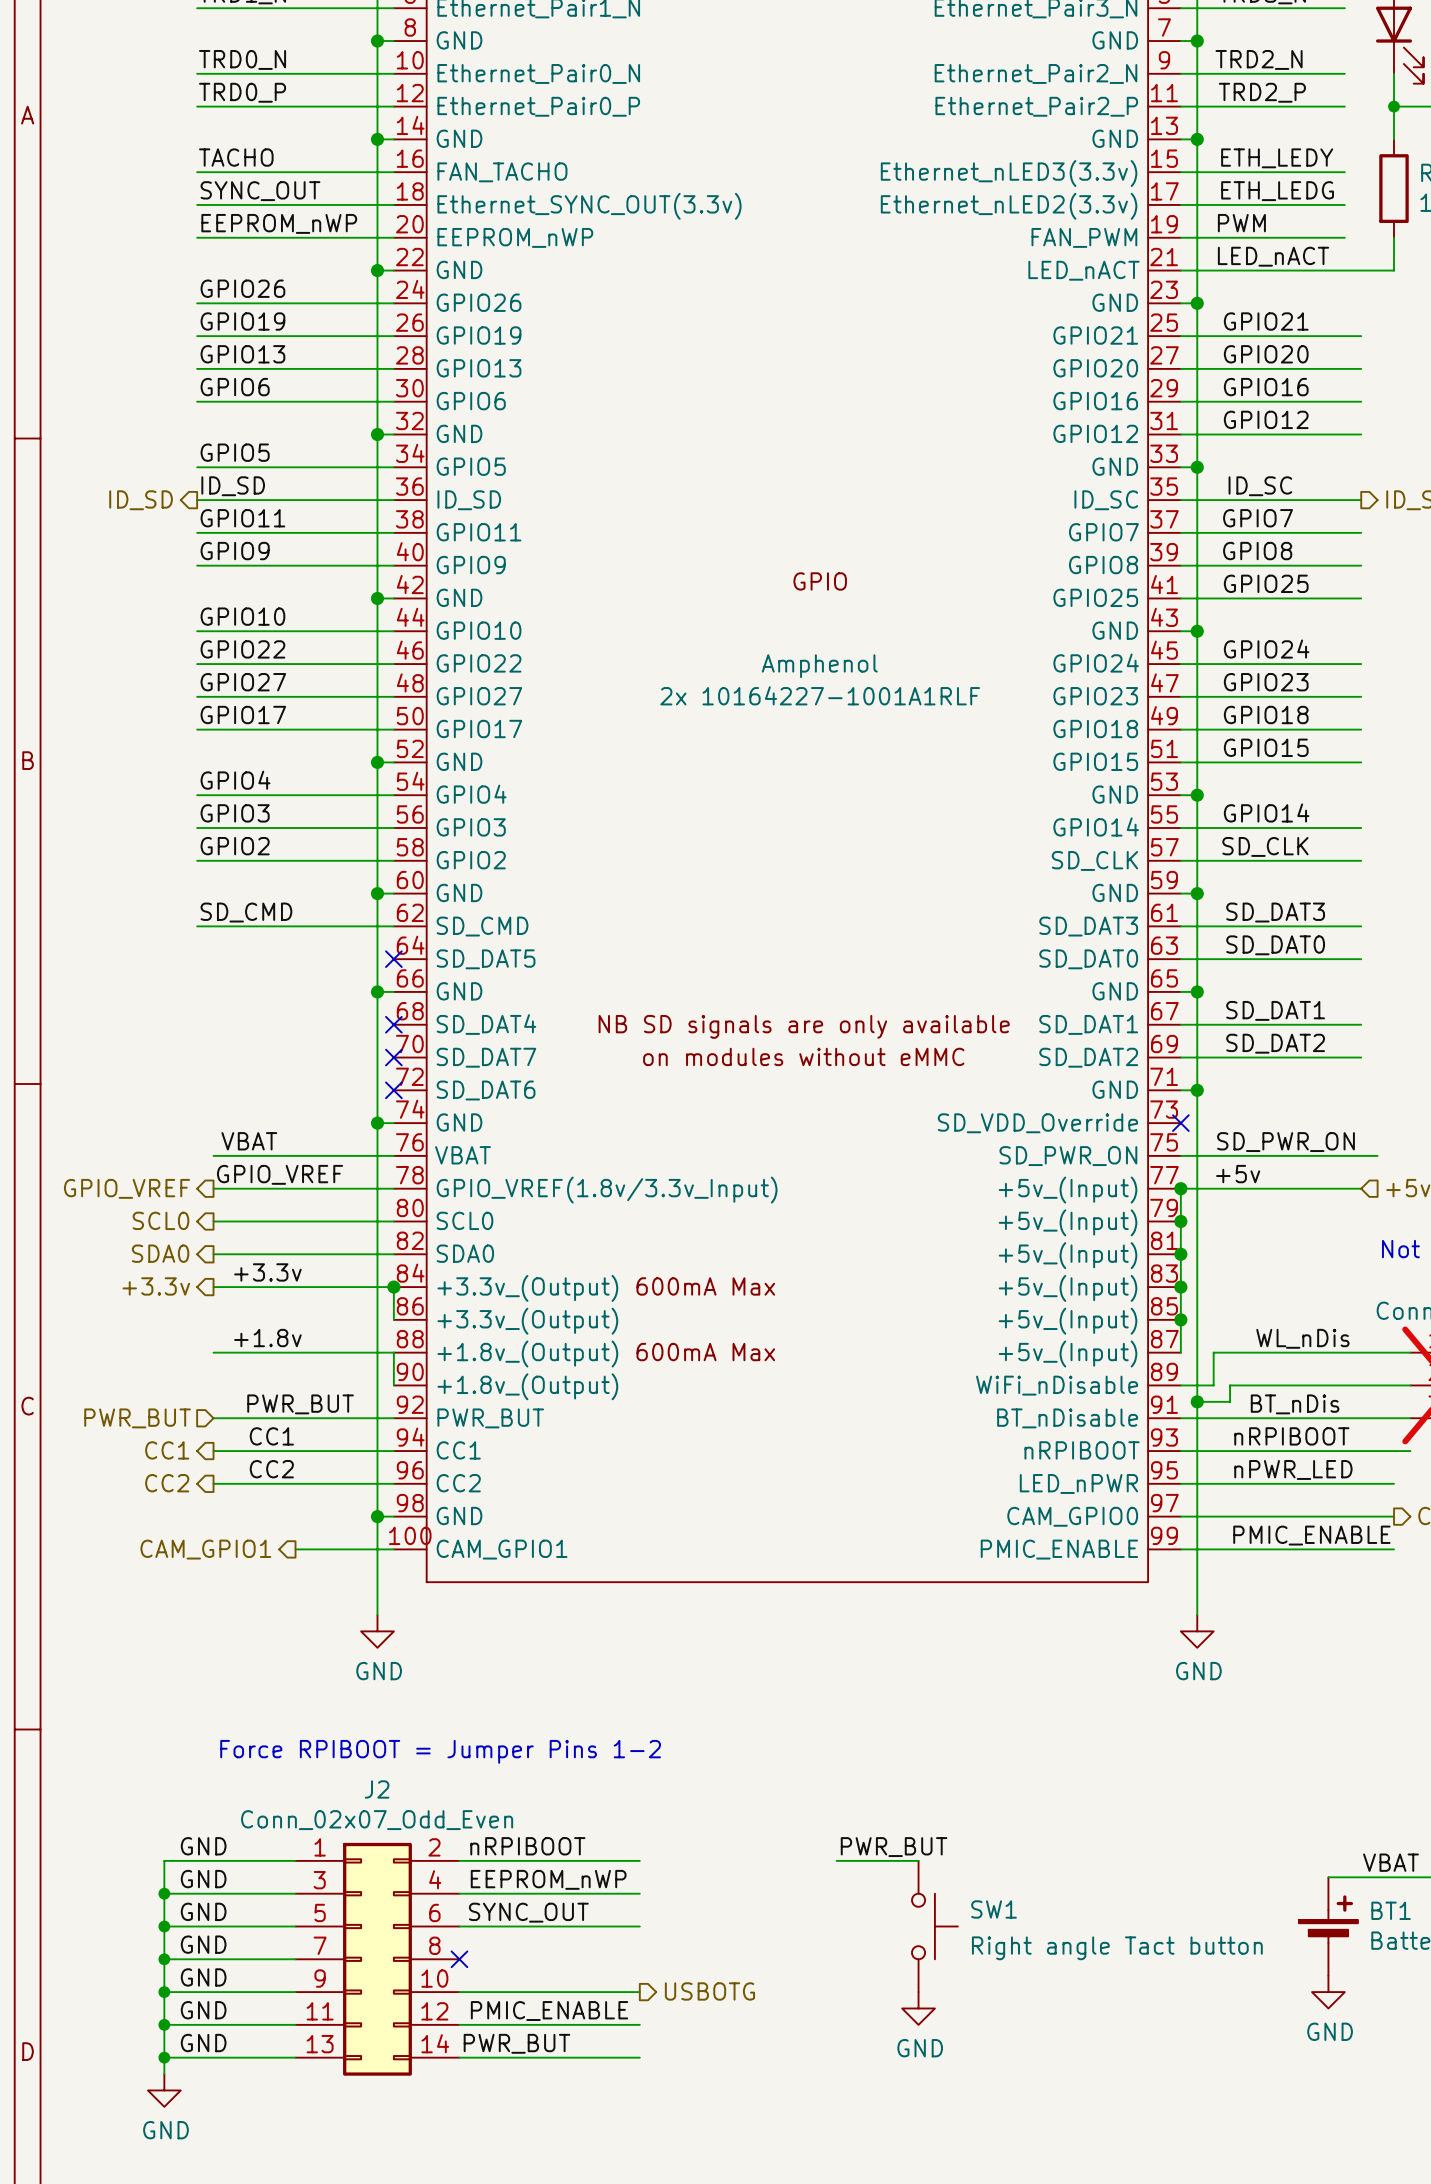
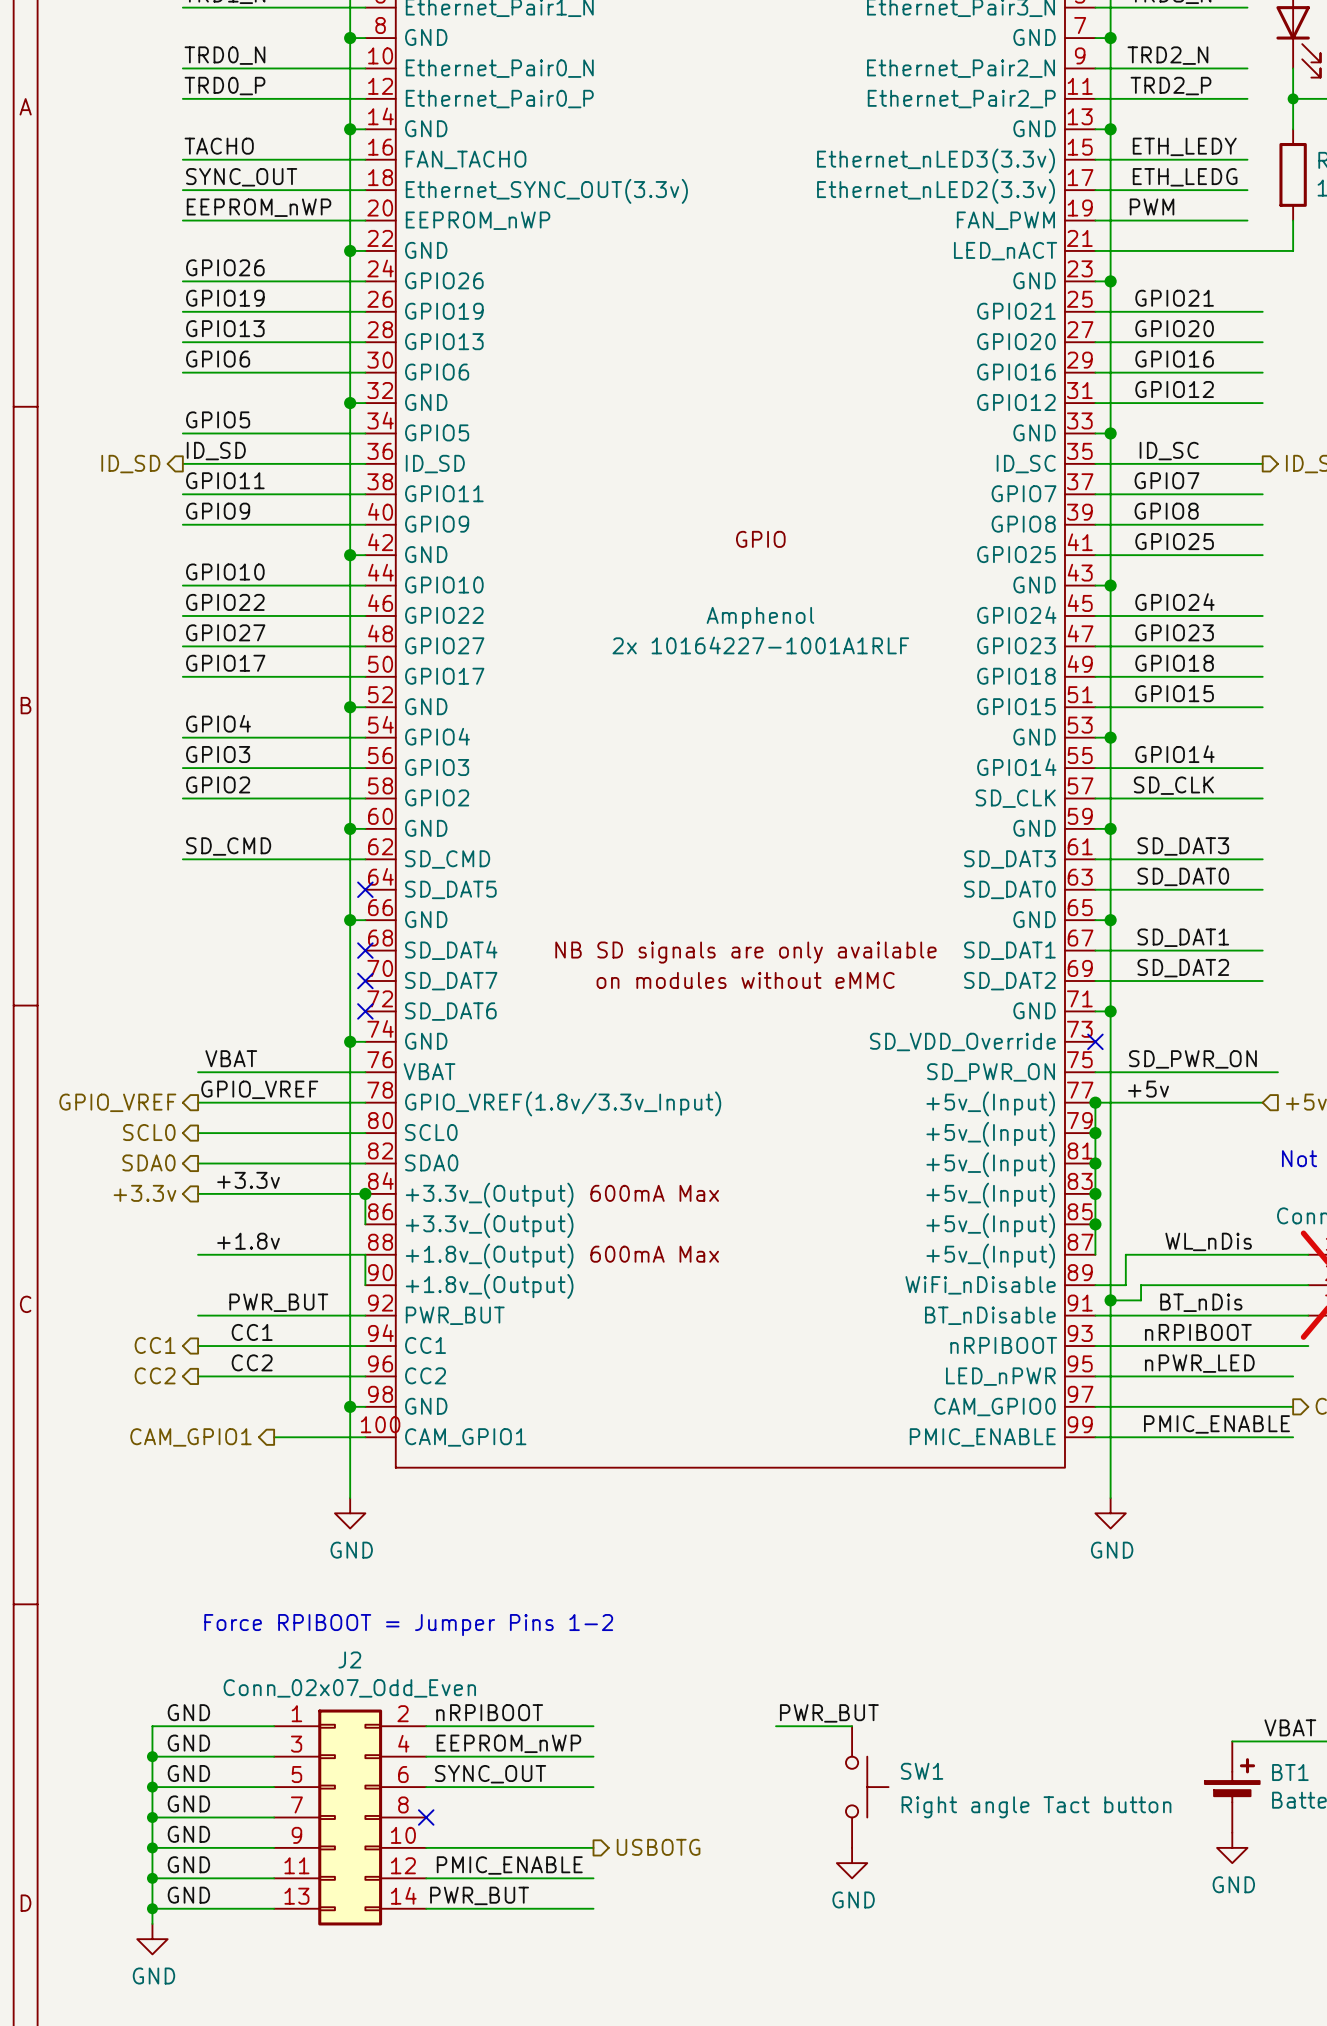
label: LED_nACT (1273, 256) -> none
hierarchical label: PWR_BUT (137, 1418) -> none

